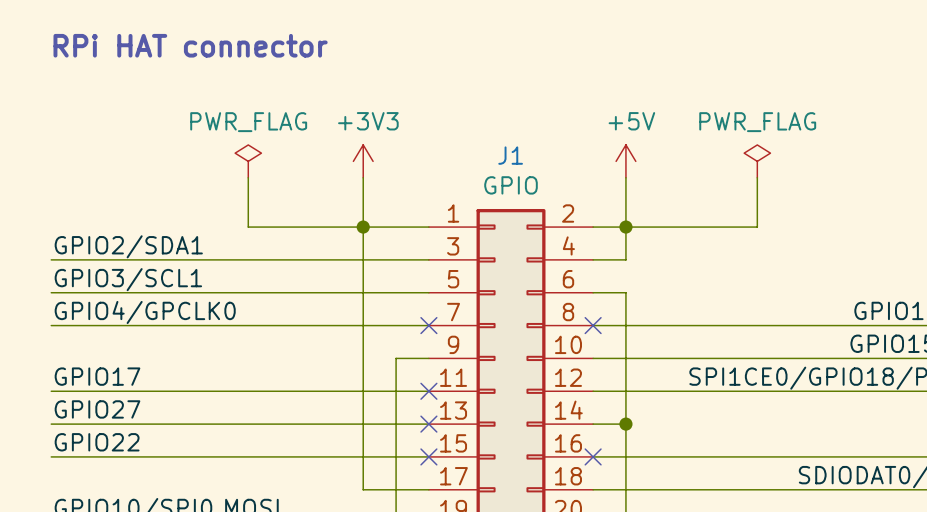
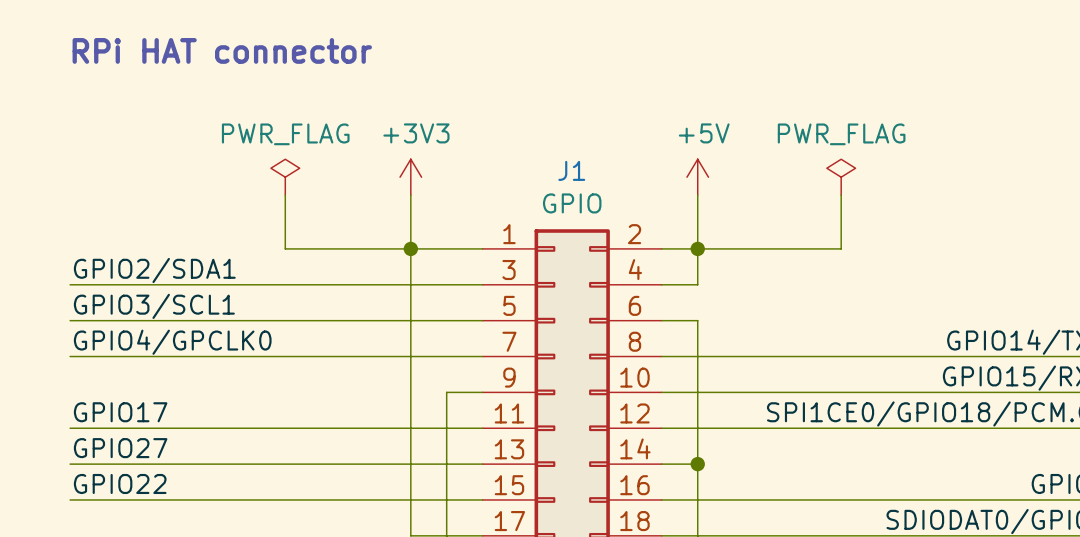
no-connect mark: (428, 325) -> none
no-connect mark: (593, 325) -> none
no-connect mark: (428, 391) -> none
no-connect mark: (428, 424) -> none
no-connect mark: (428, 456) -> none
no-connect mark: (593, 456) -> none

